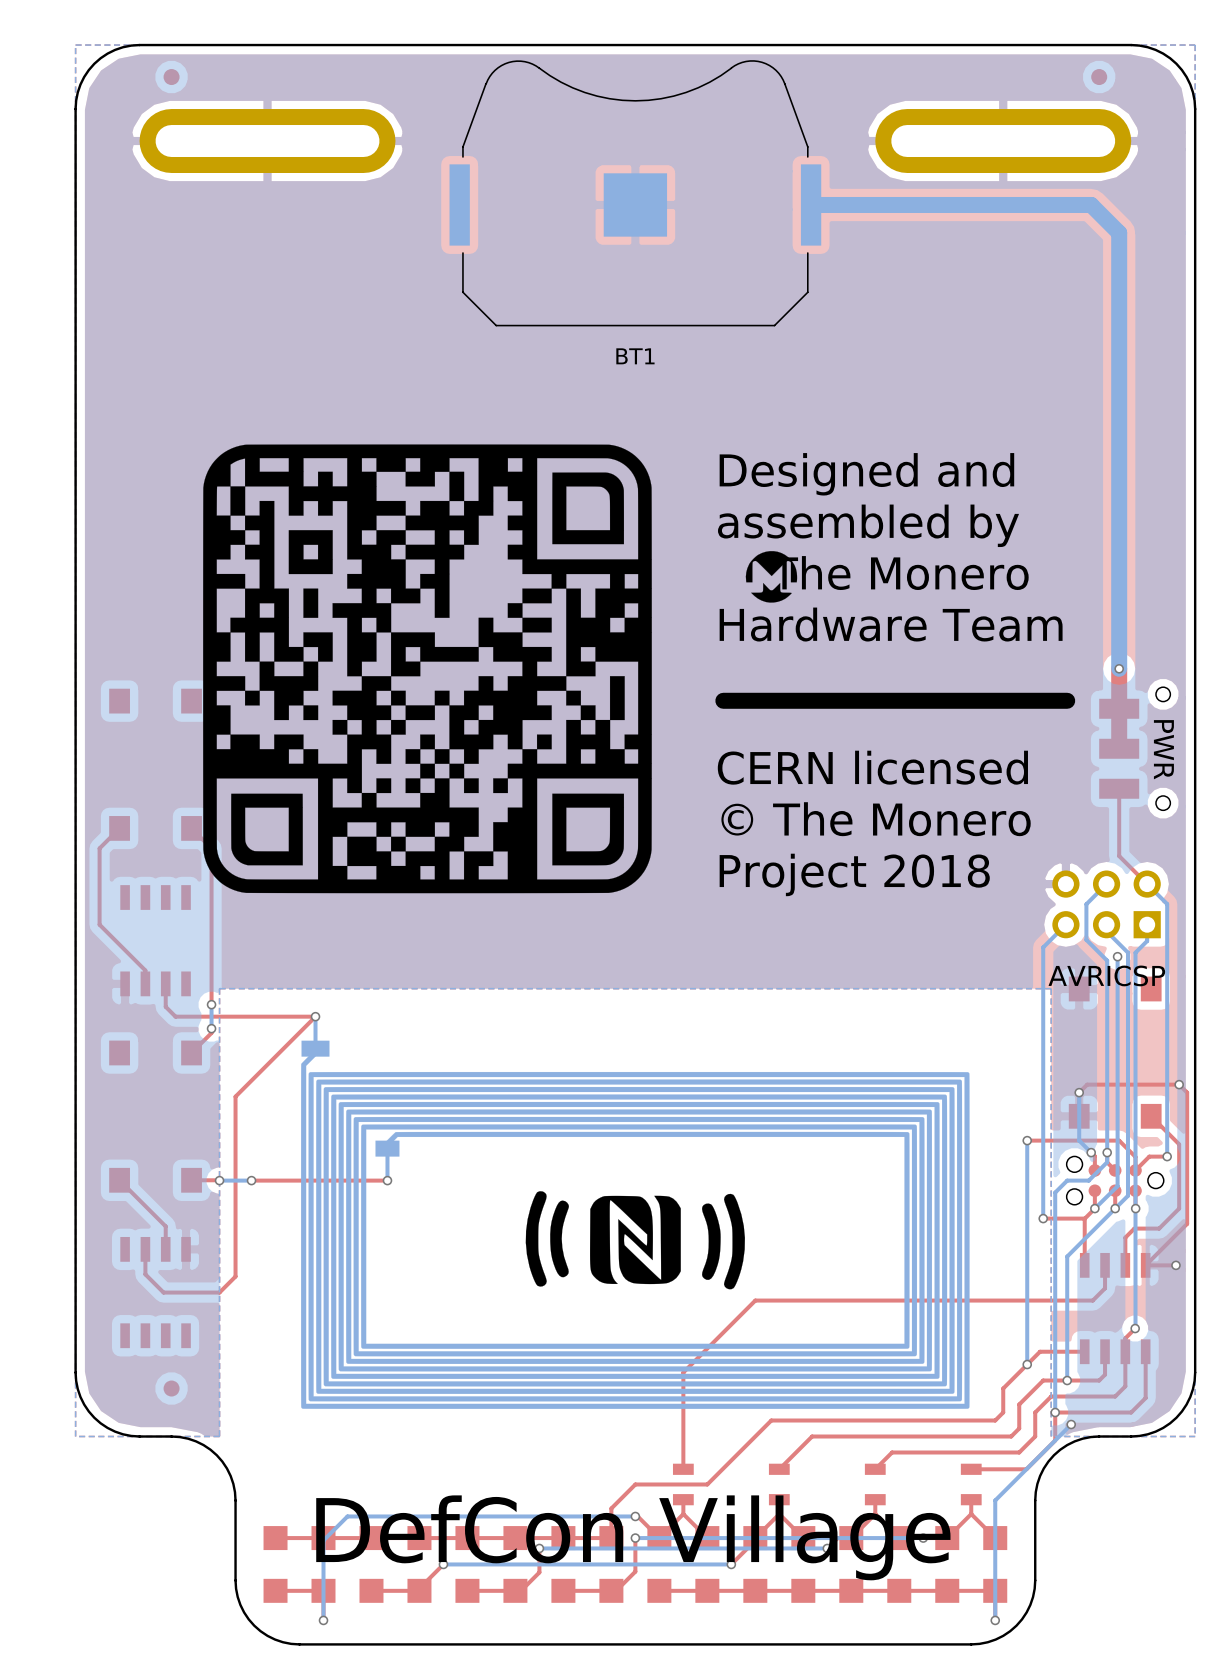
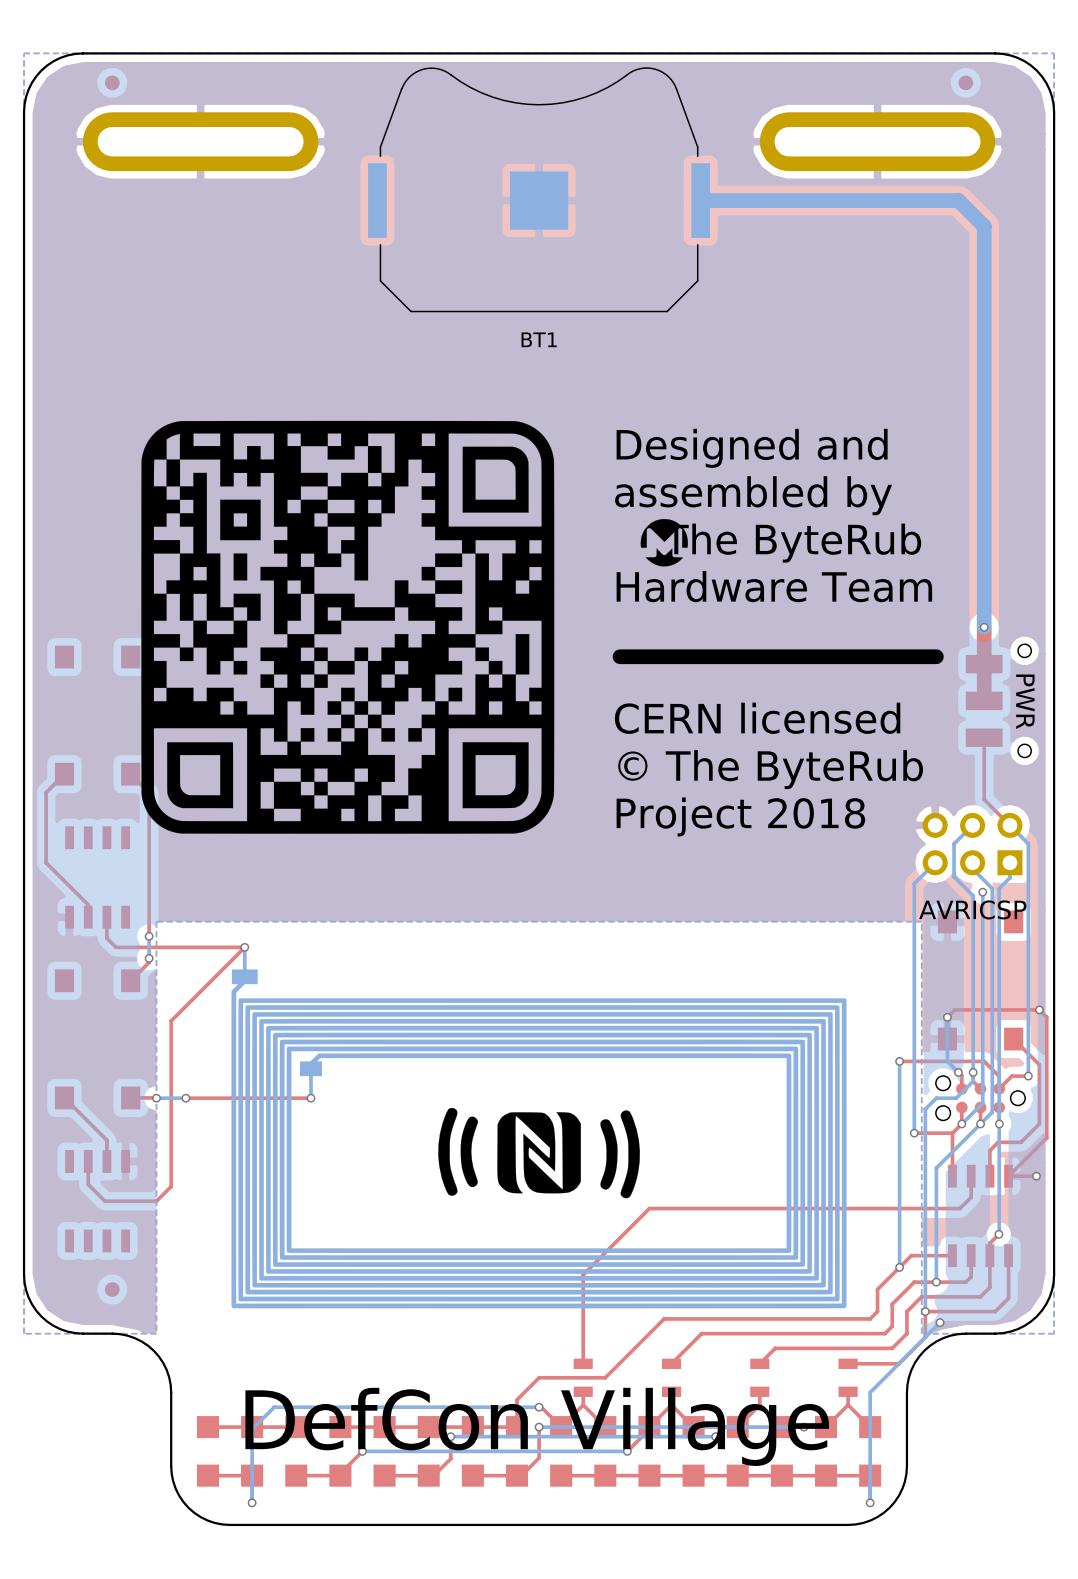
text: The Monero (899, 573) -> The ByteRub (792, 543)
text: © The Monero (876, 819) -> © The ByteRub (770, 769)

